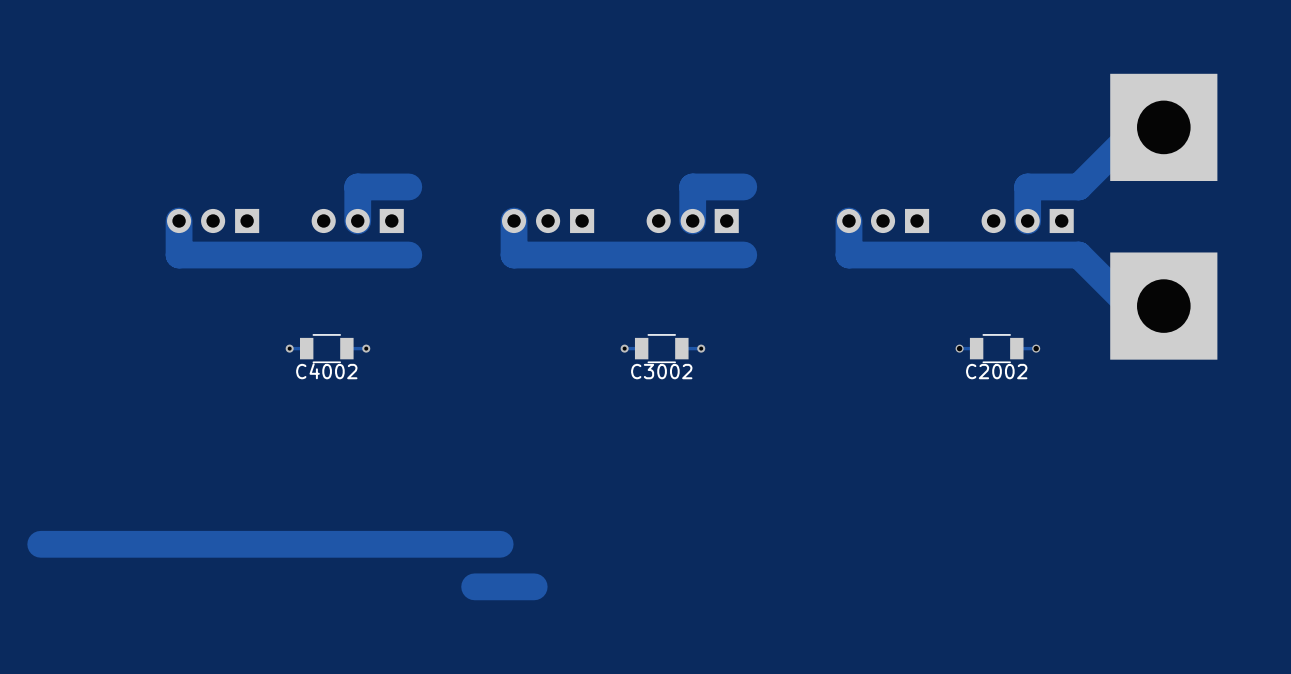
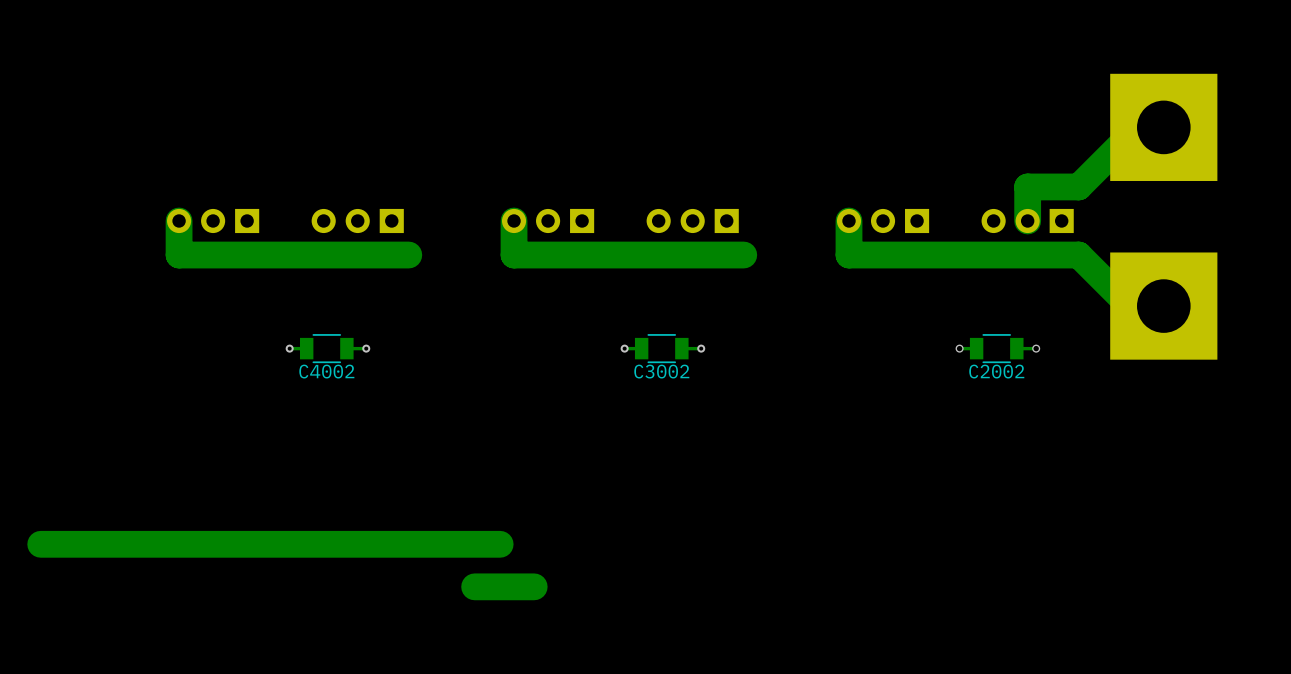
track: (408, 186) (357, 186) (357, 220) -> none
track: (743, 186) (692, 186) (692, 220) -> none

